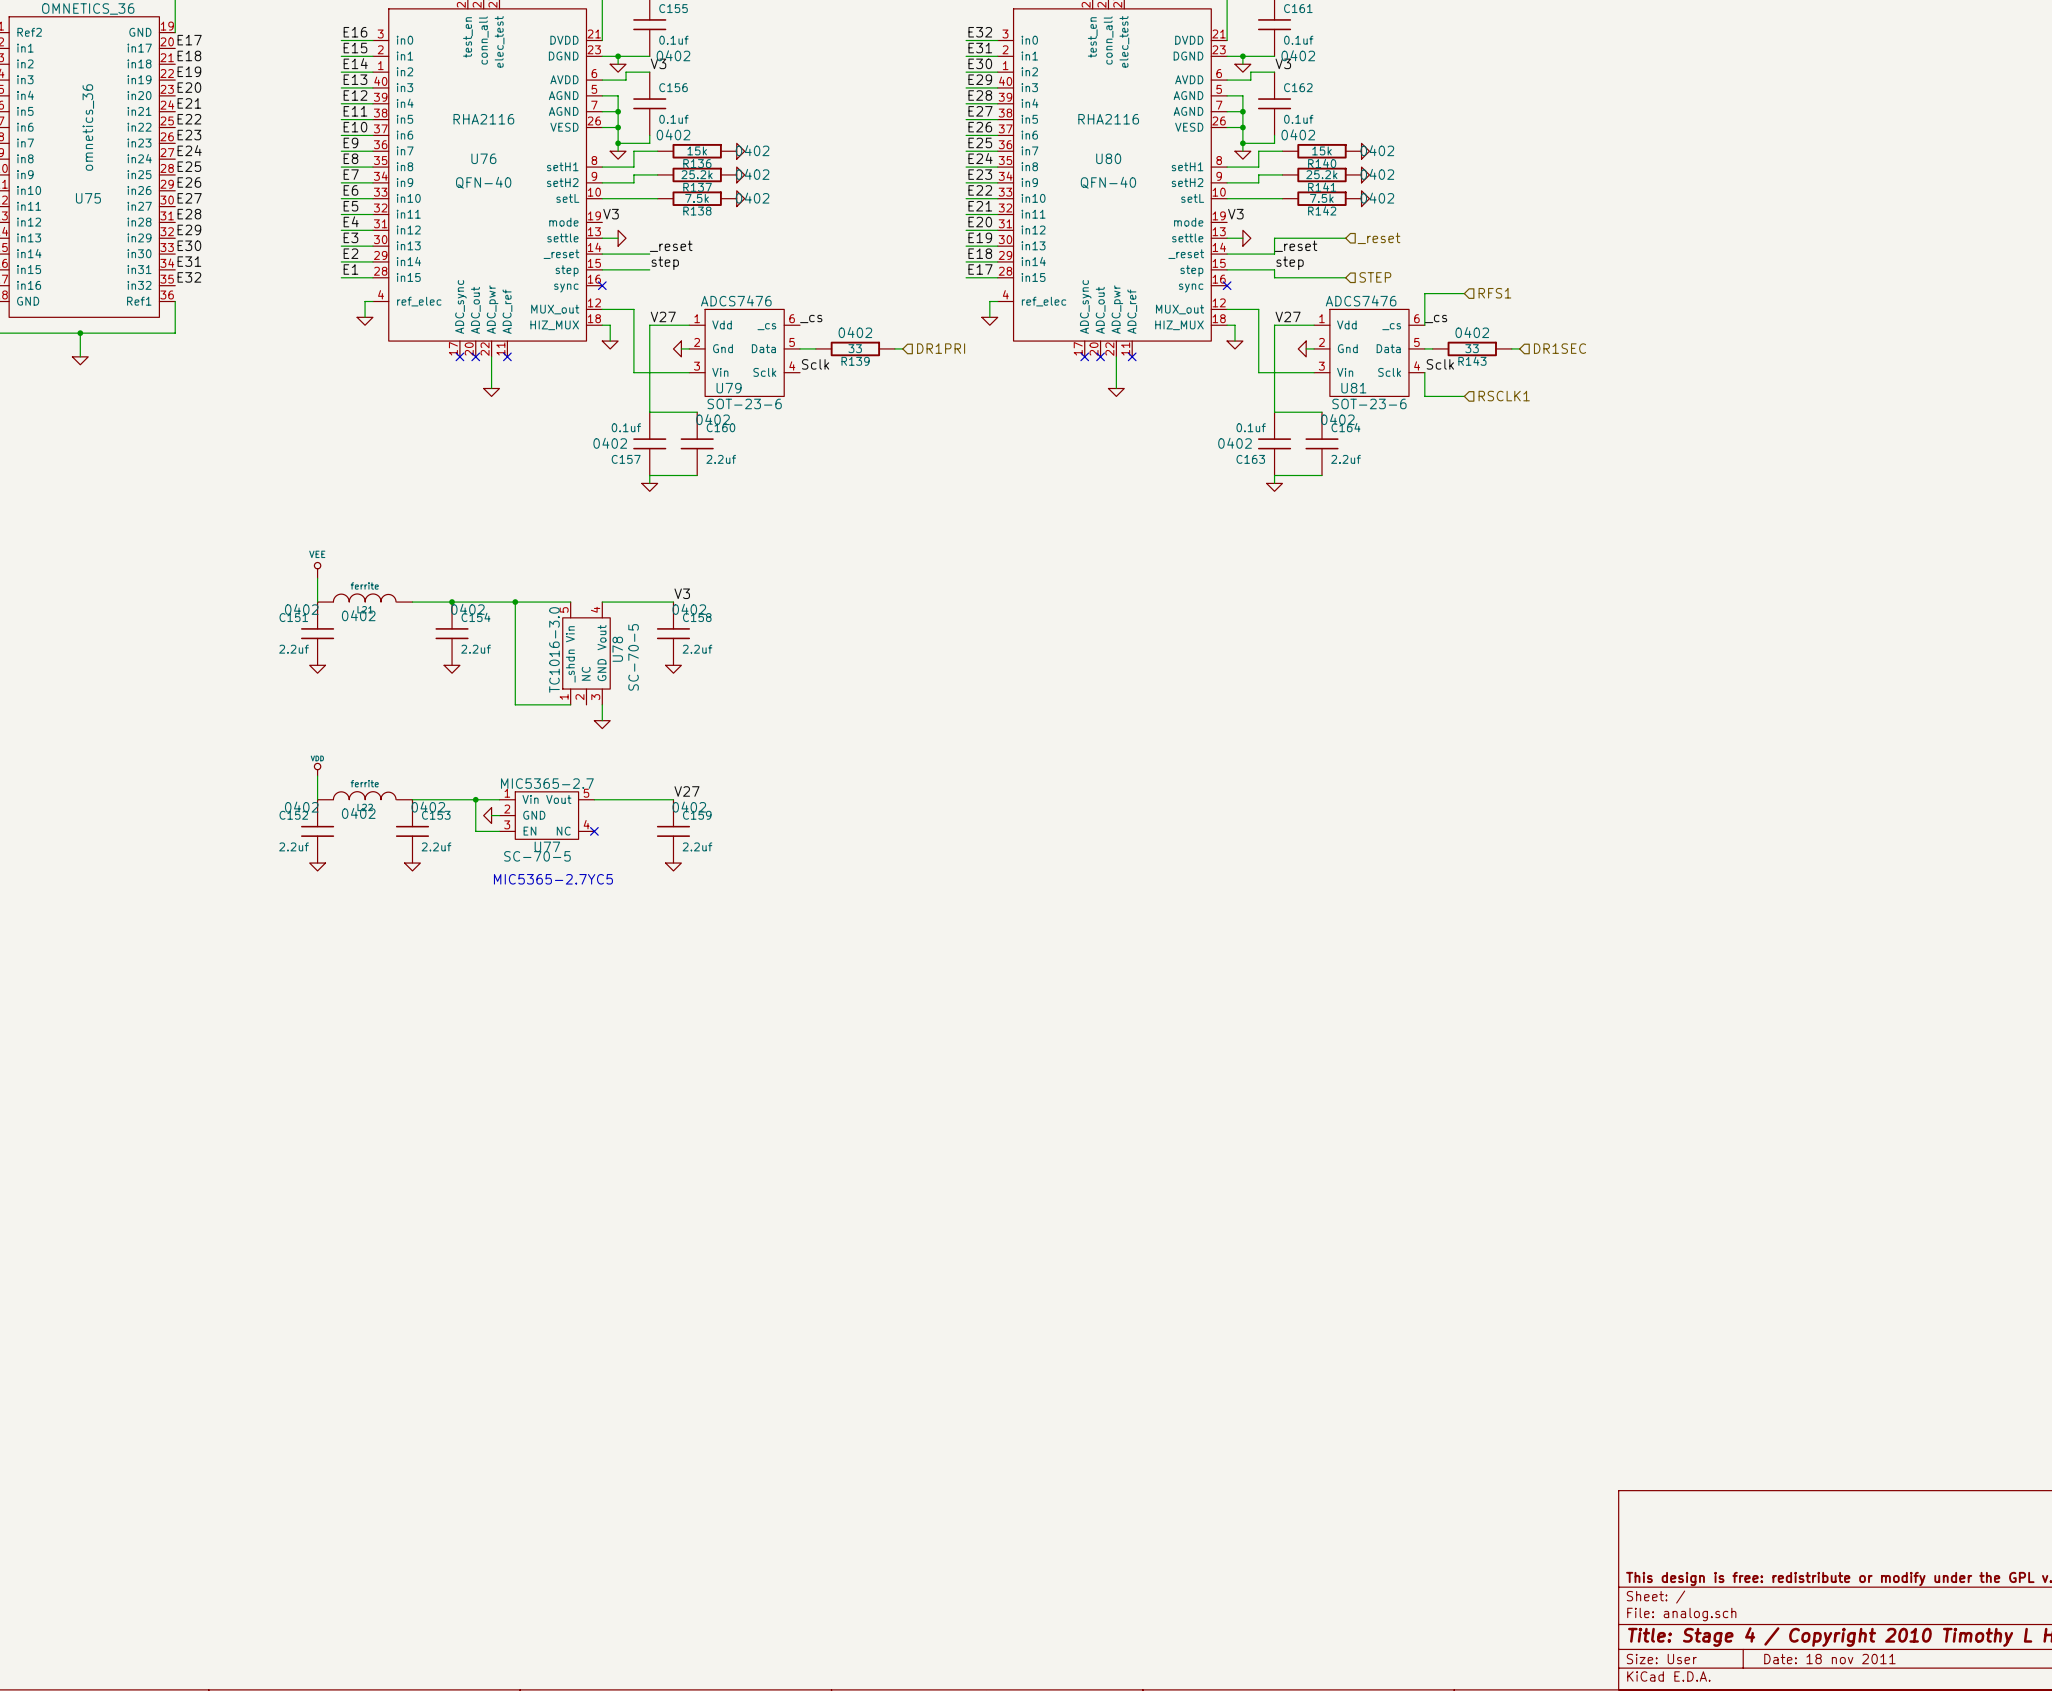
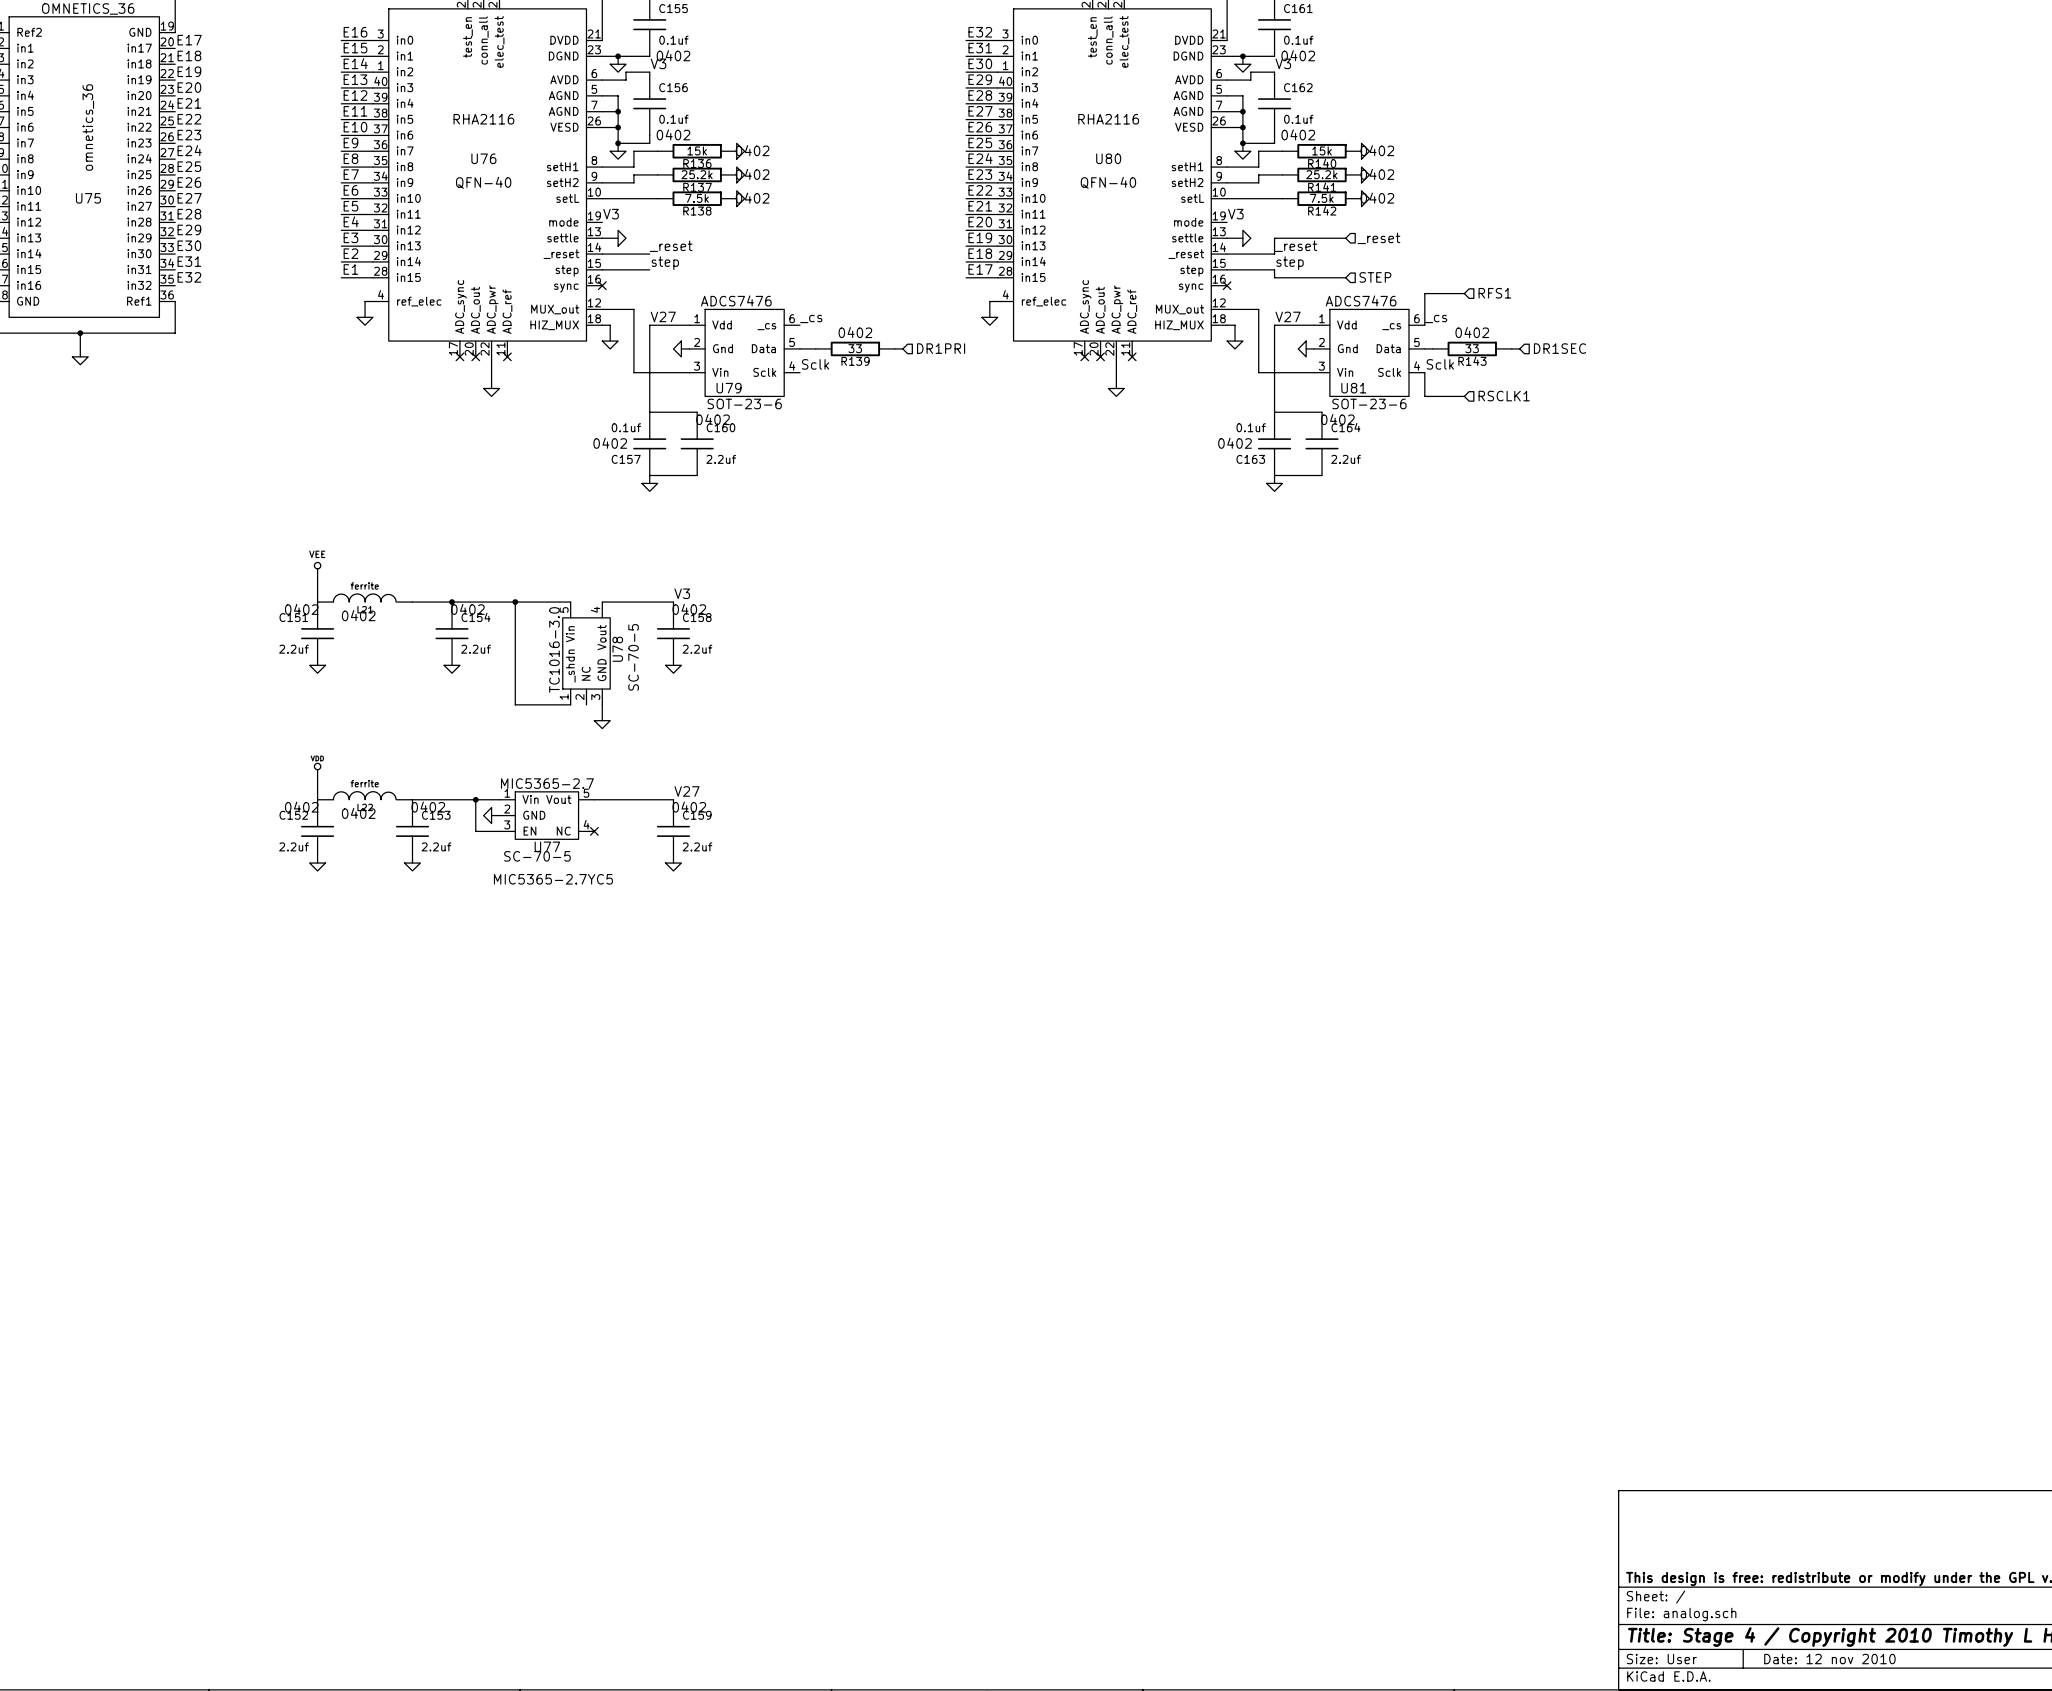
title block: Date: 18 nov 2011 (1829, 1659) -> Date: 12 nov 2010 (1829, 1659)

